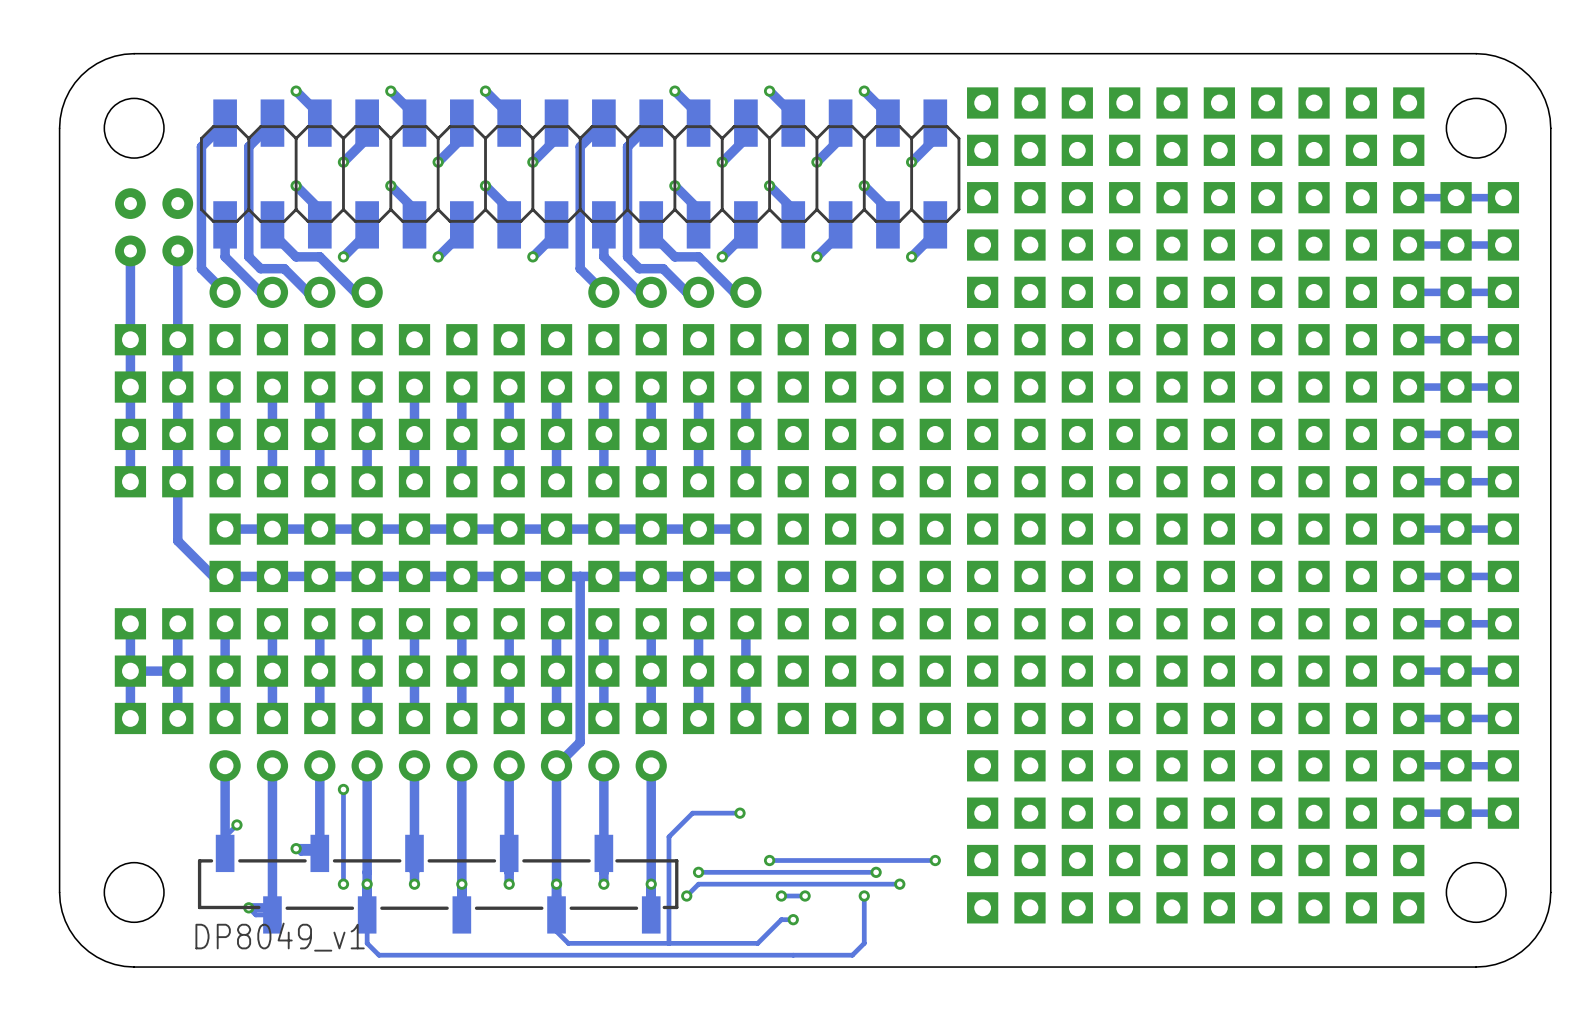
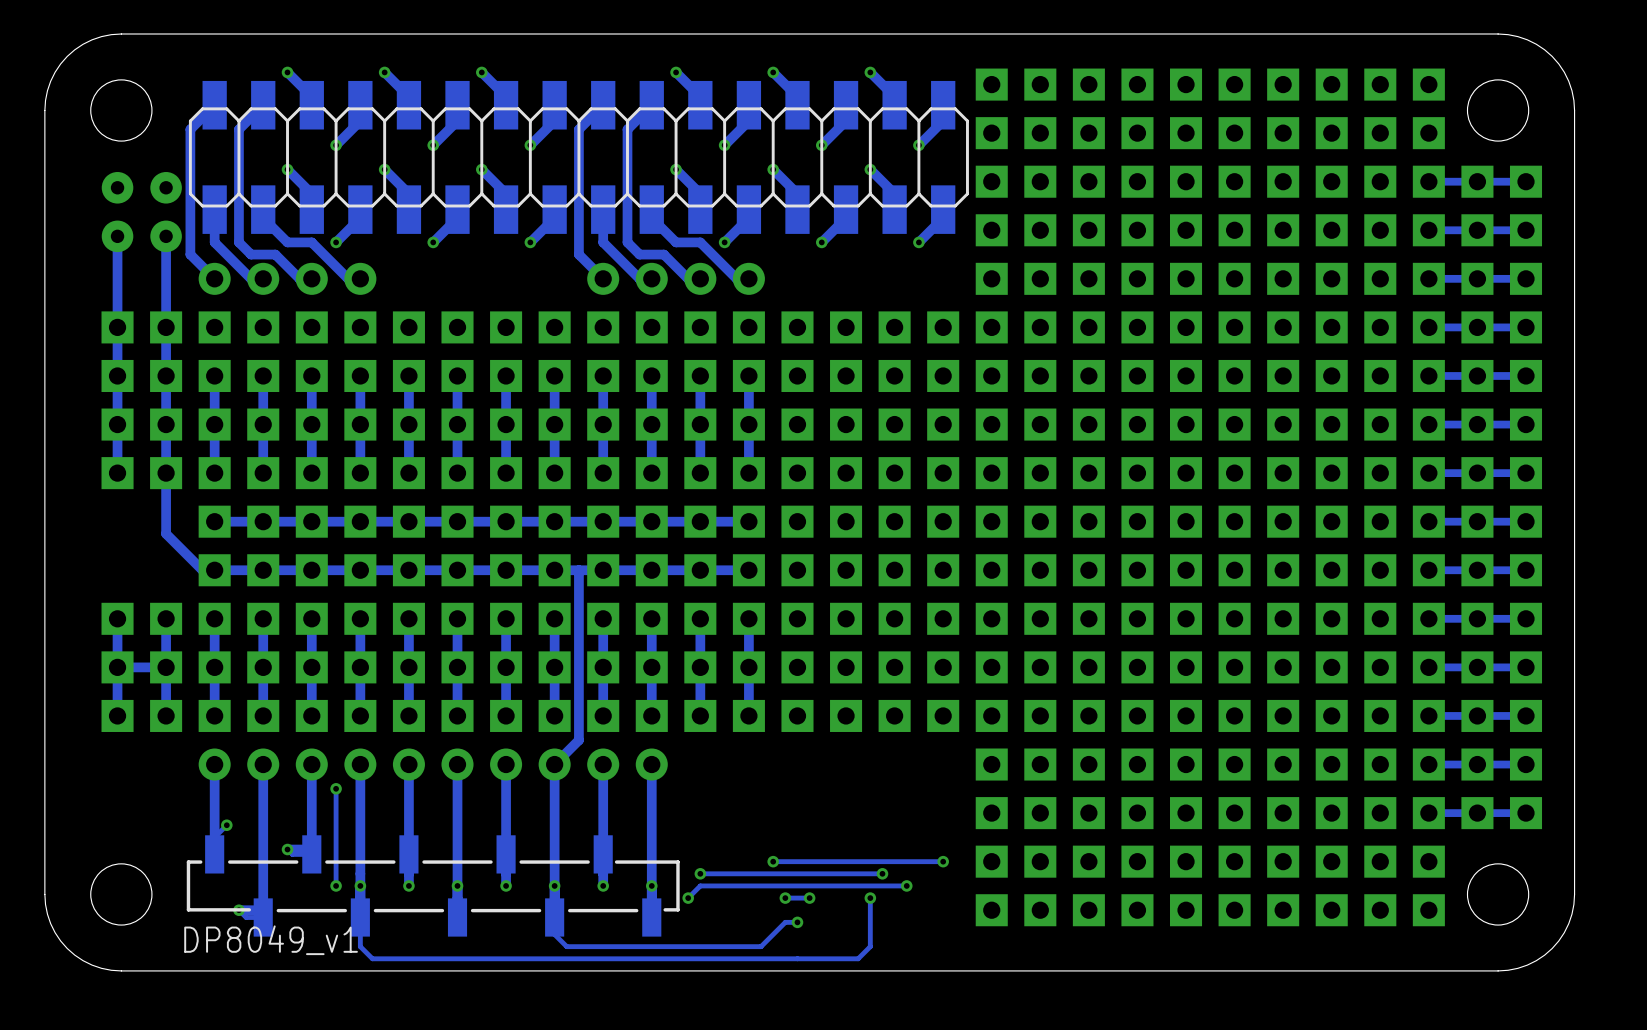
track: (739, 813) (692, 813) (668, 836) (668, 943) -> none
via: (739, 813) -> none

